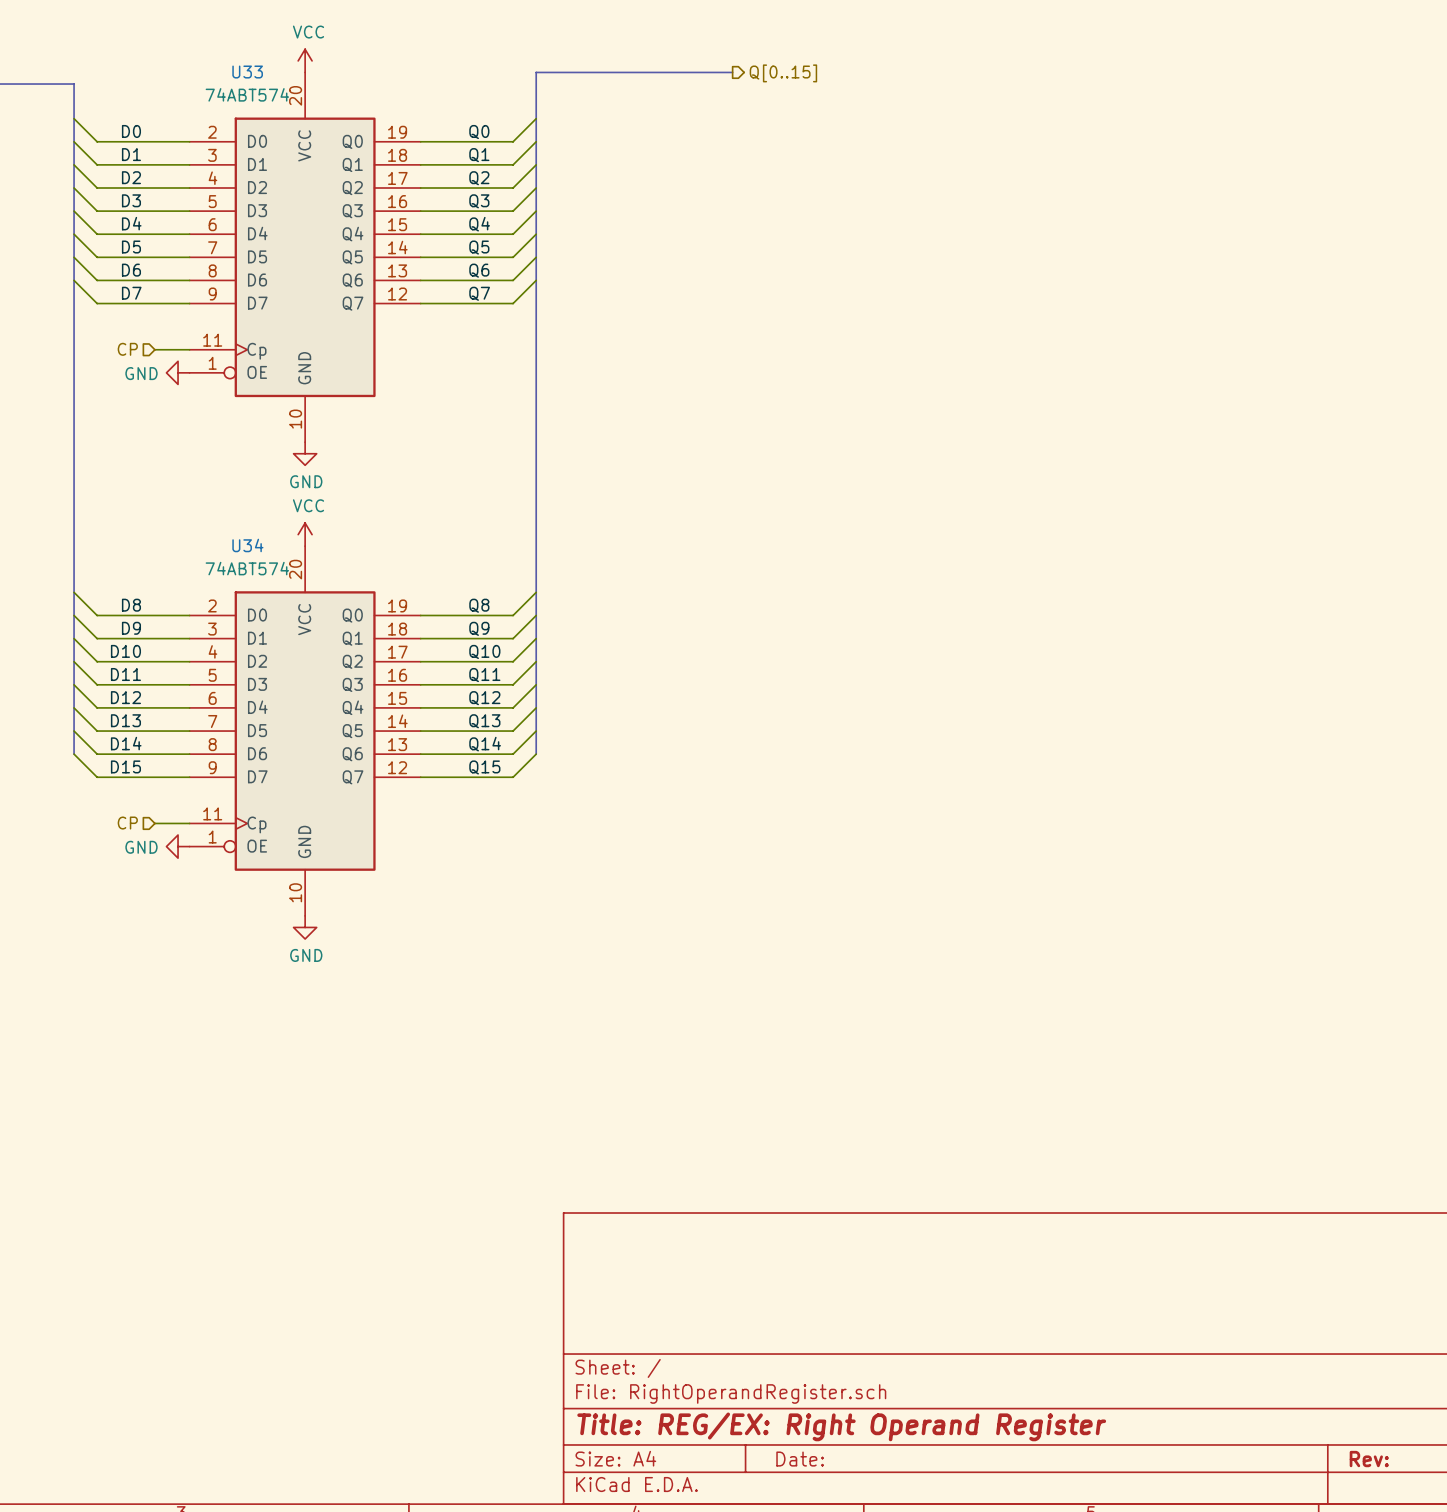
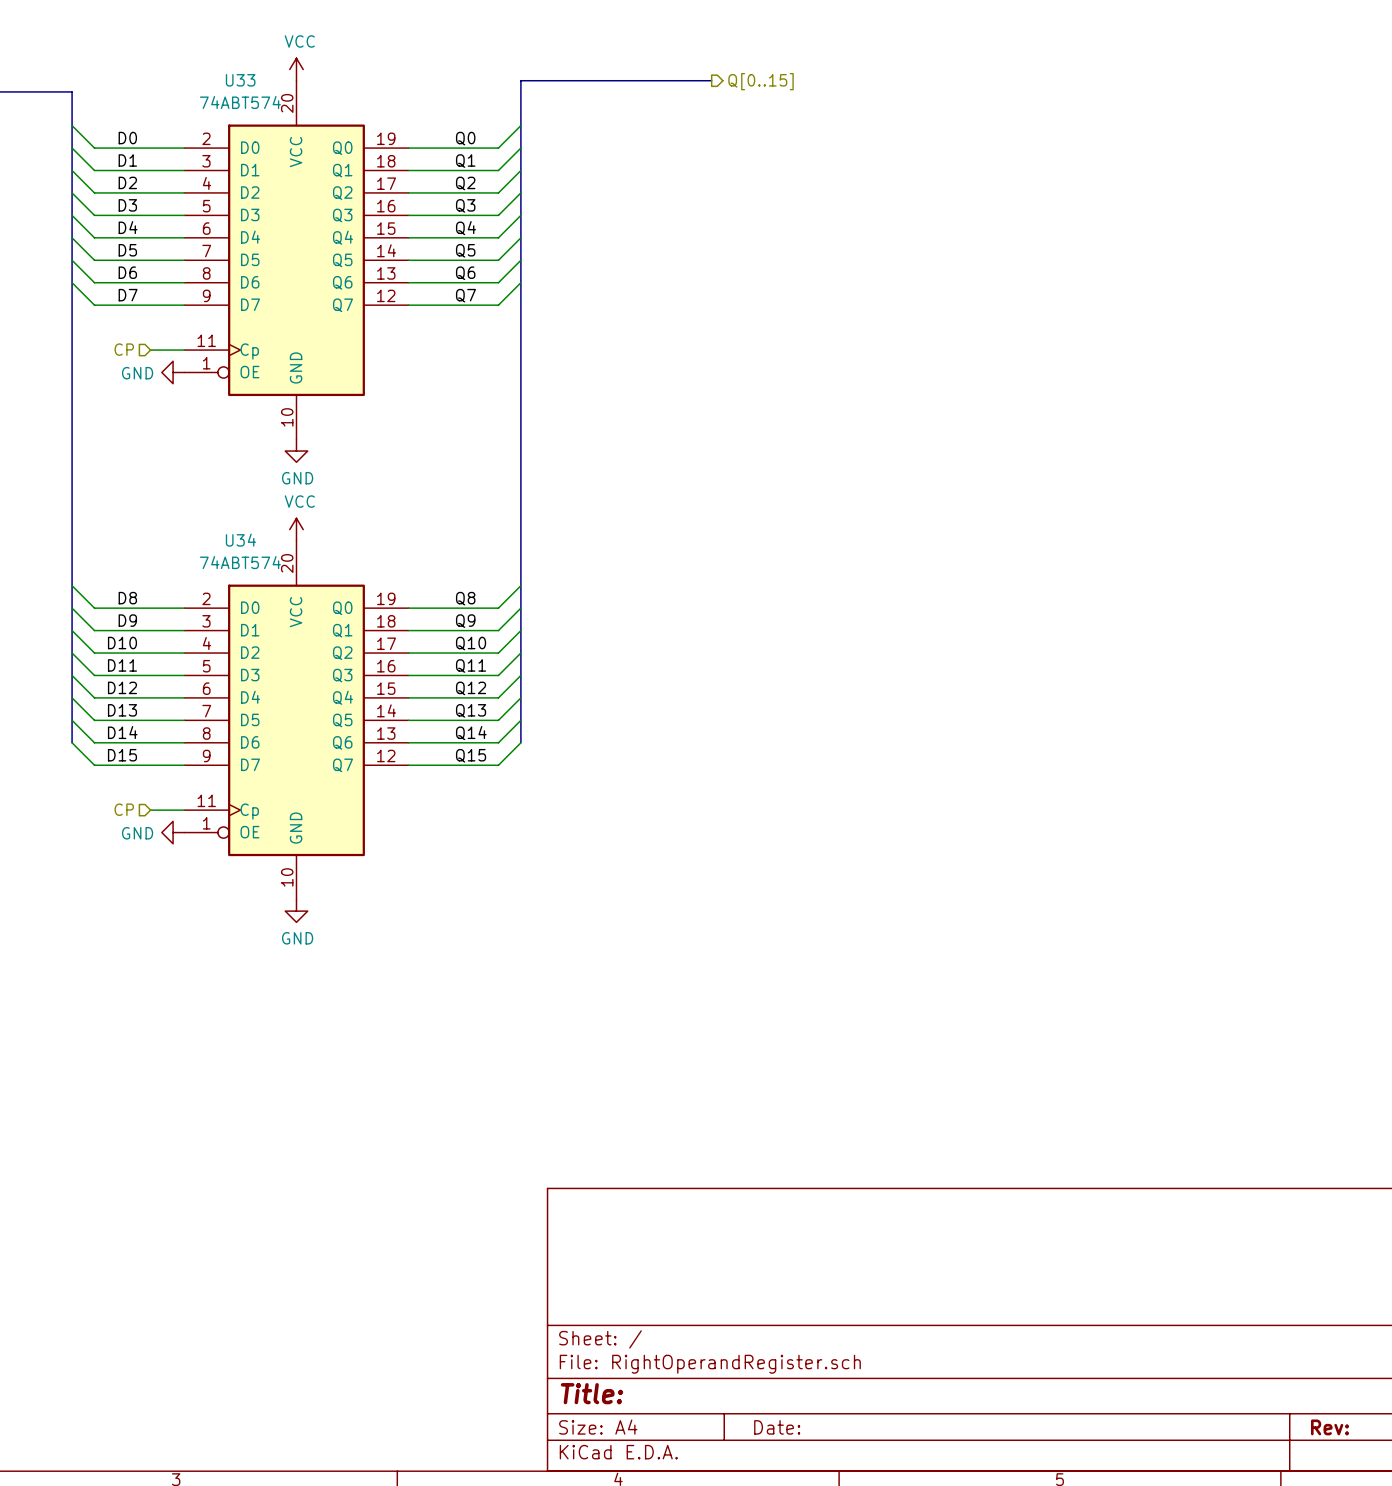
title block: Title: REG/EX: Right Operand Register (841, 1426) -> Title: (591, 1393)

